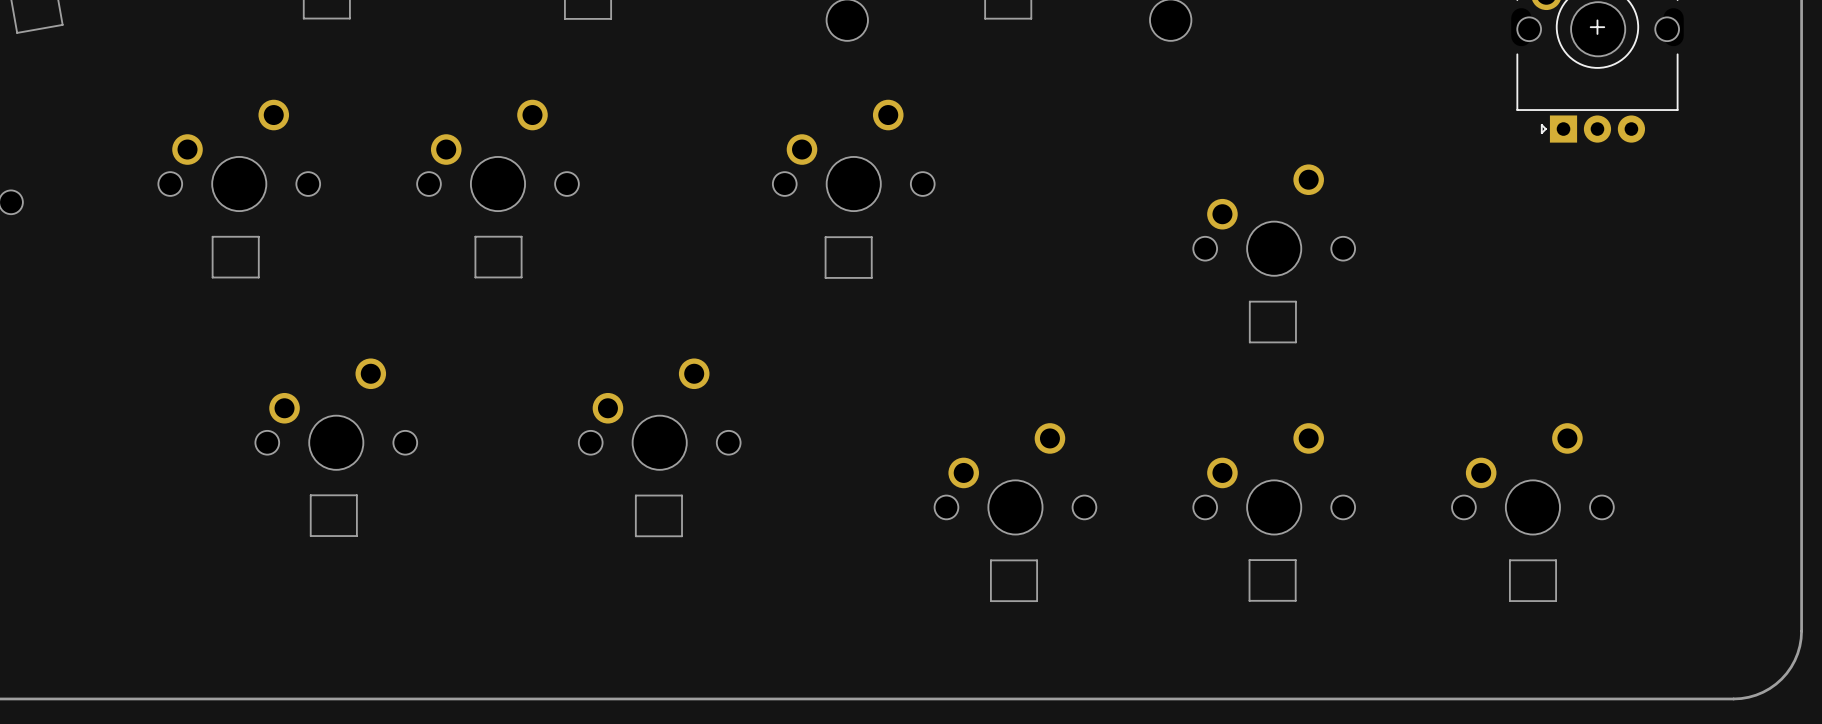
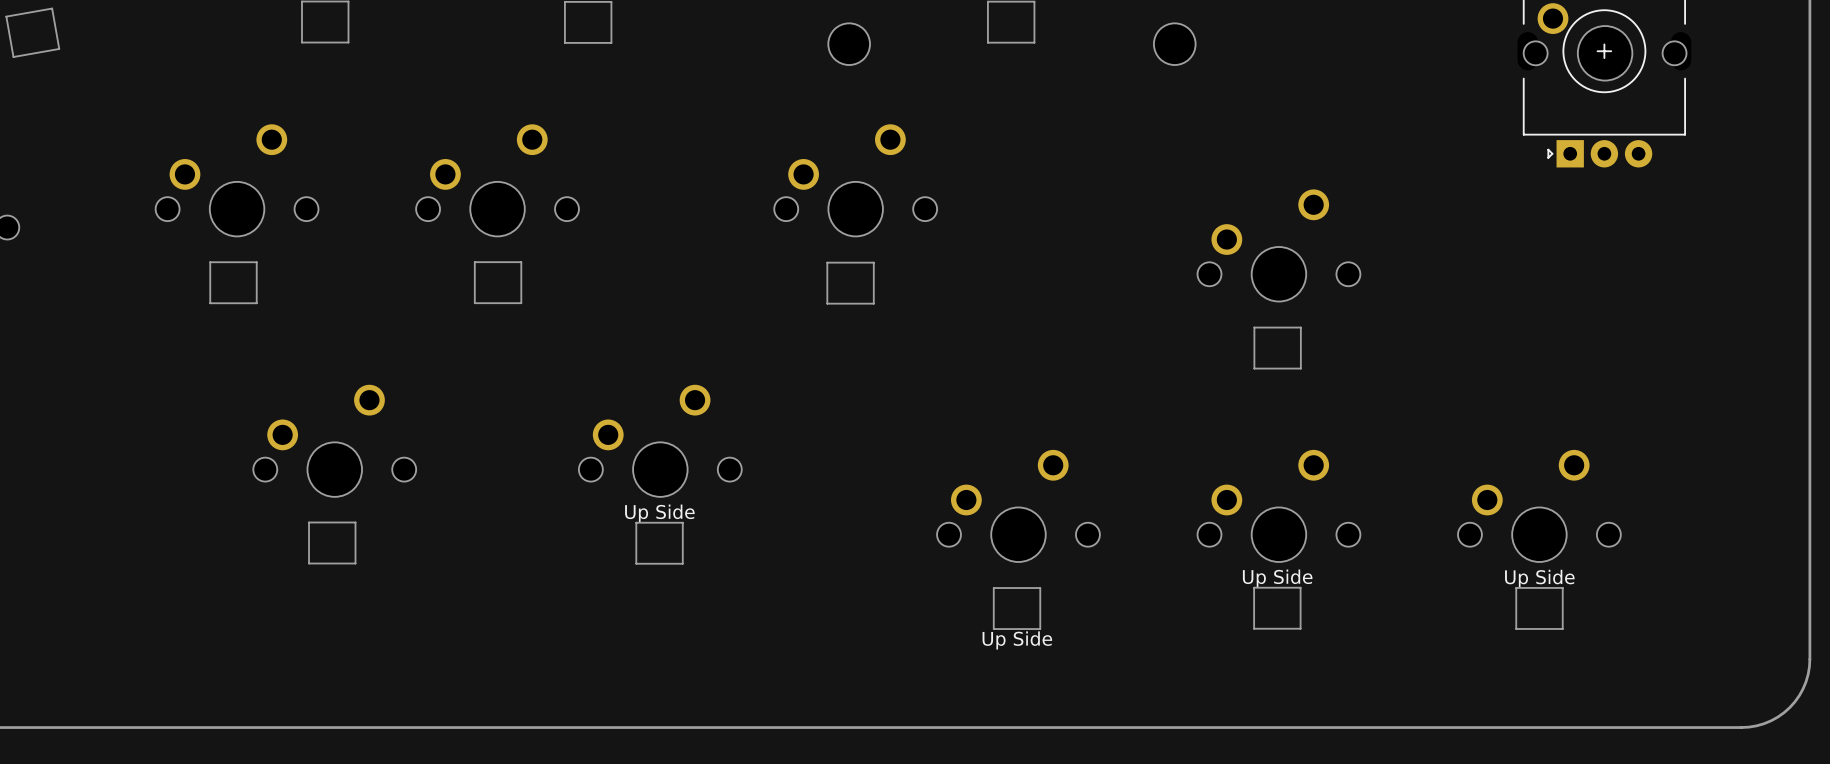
part text: none -> Up Side (659, 513)
part text: none -> Up Side (1277, 578)
part text: none -> Up Side (1539, 578)
part text: none -> Up Side (1017, 640)

